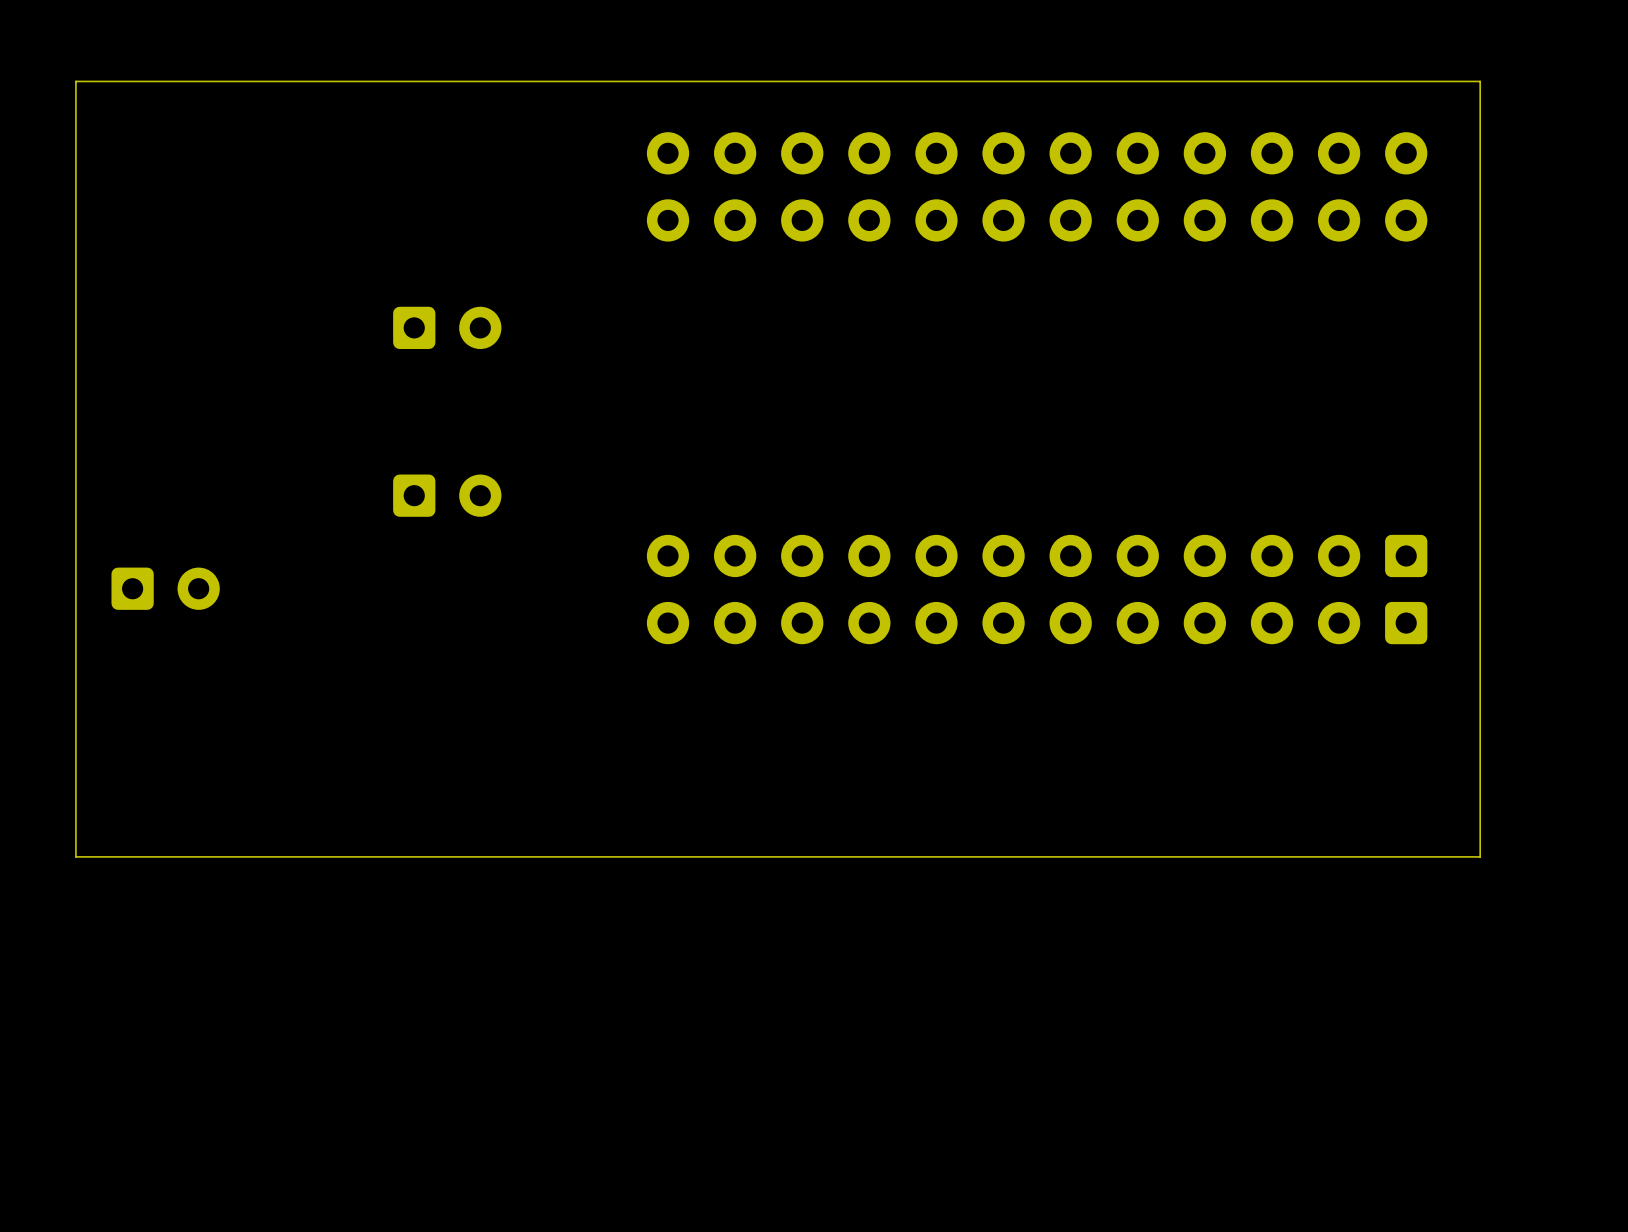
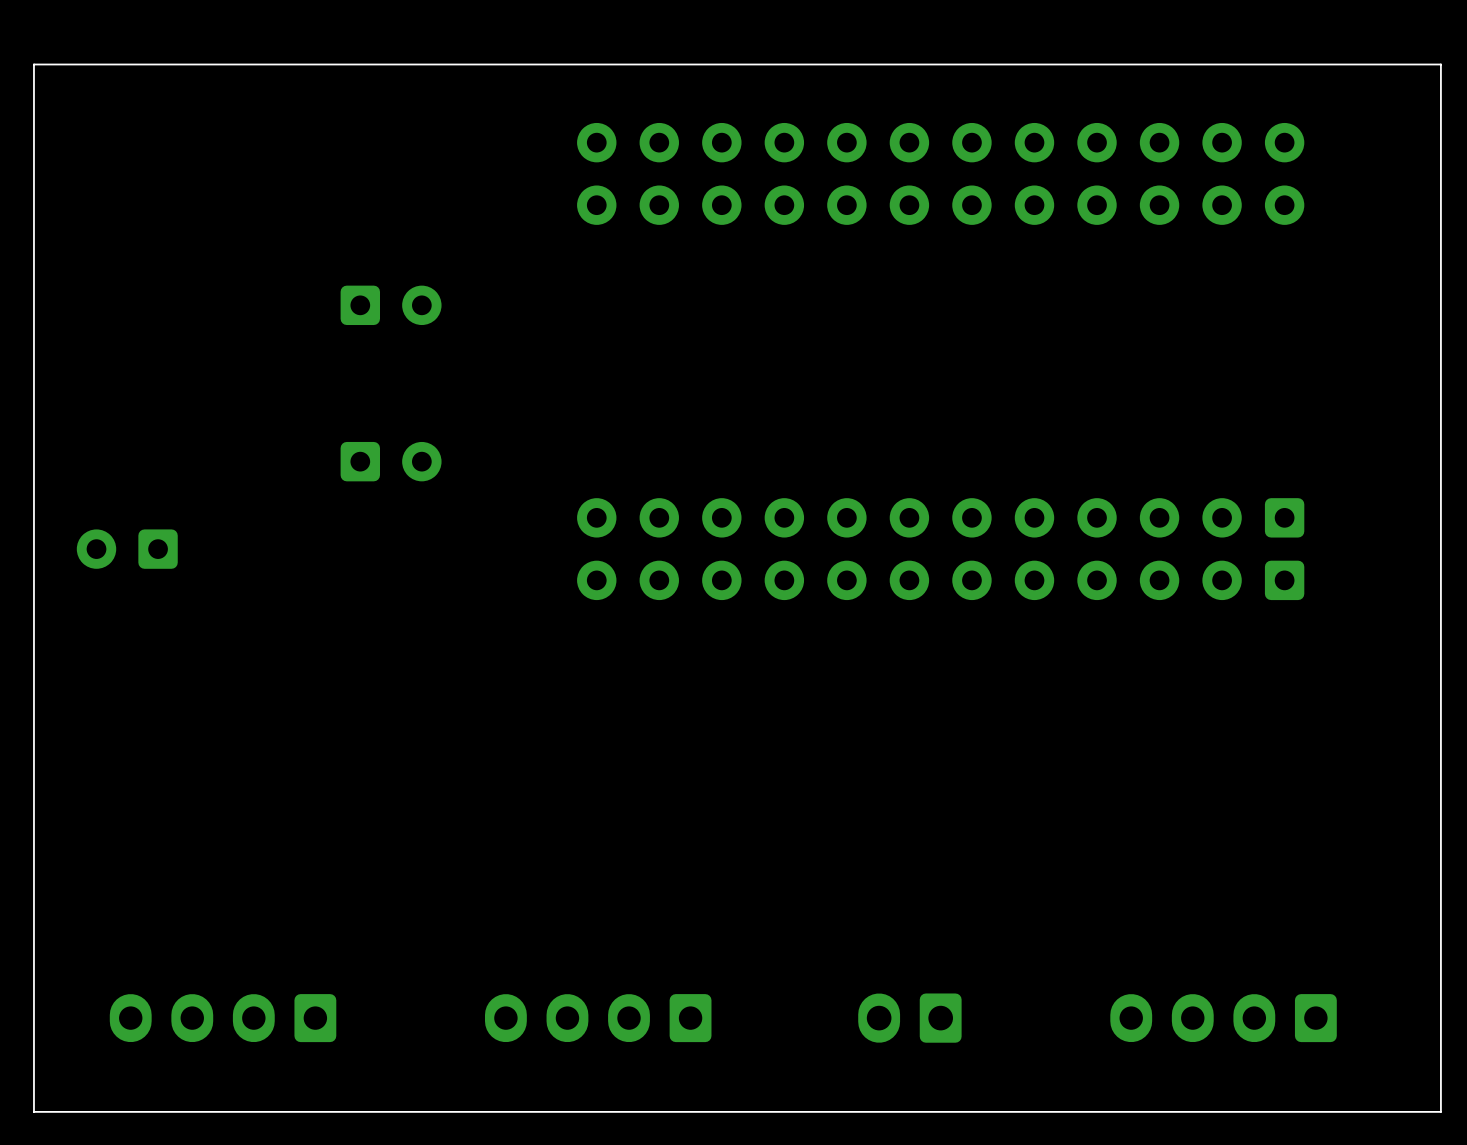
board edge: (1480, 81) (75, 81) (75, 856) (1480, 856) (1480, 81) -> (1440, 64) (1440, 1111) (33, 1111) (33, 64) (1440, 64)
part rotation: 0° (165, 588) -> 180° (127, 549)
part: none -> (223, 1018)
part: none -> (598, 1018)
part: none -> (909, 1018)
part: none -> (1223, 1018)

